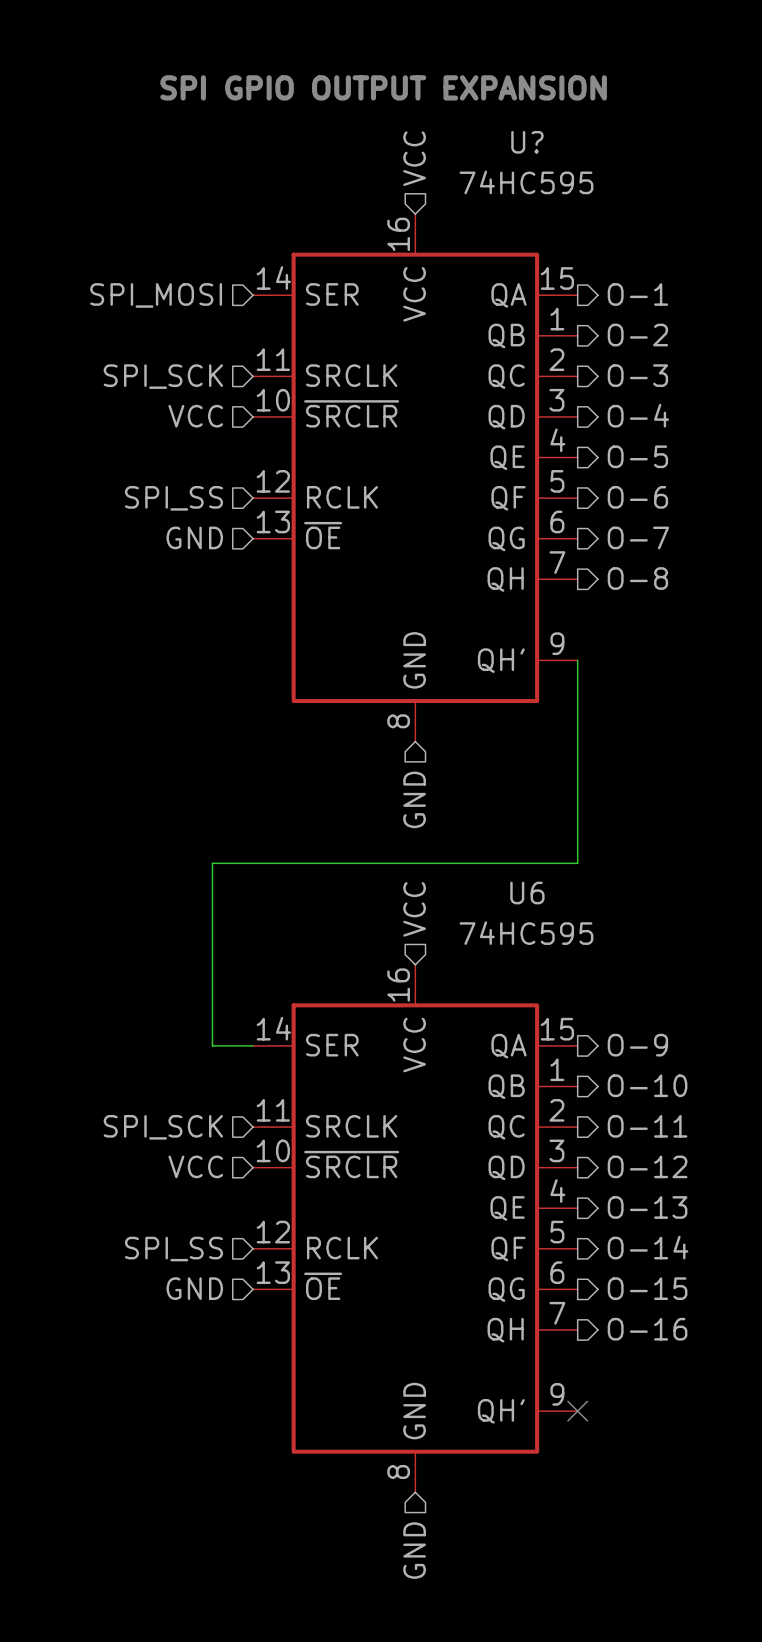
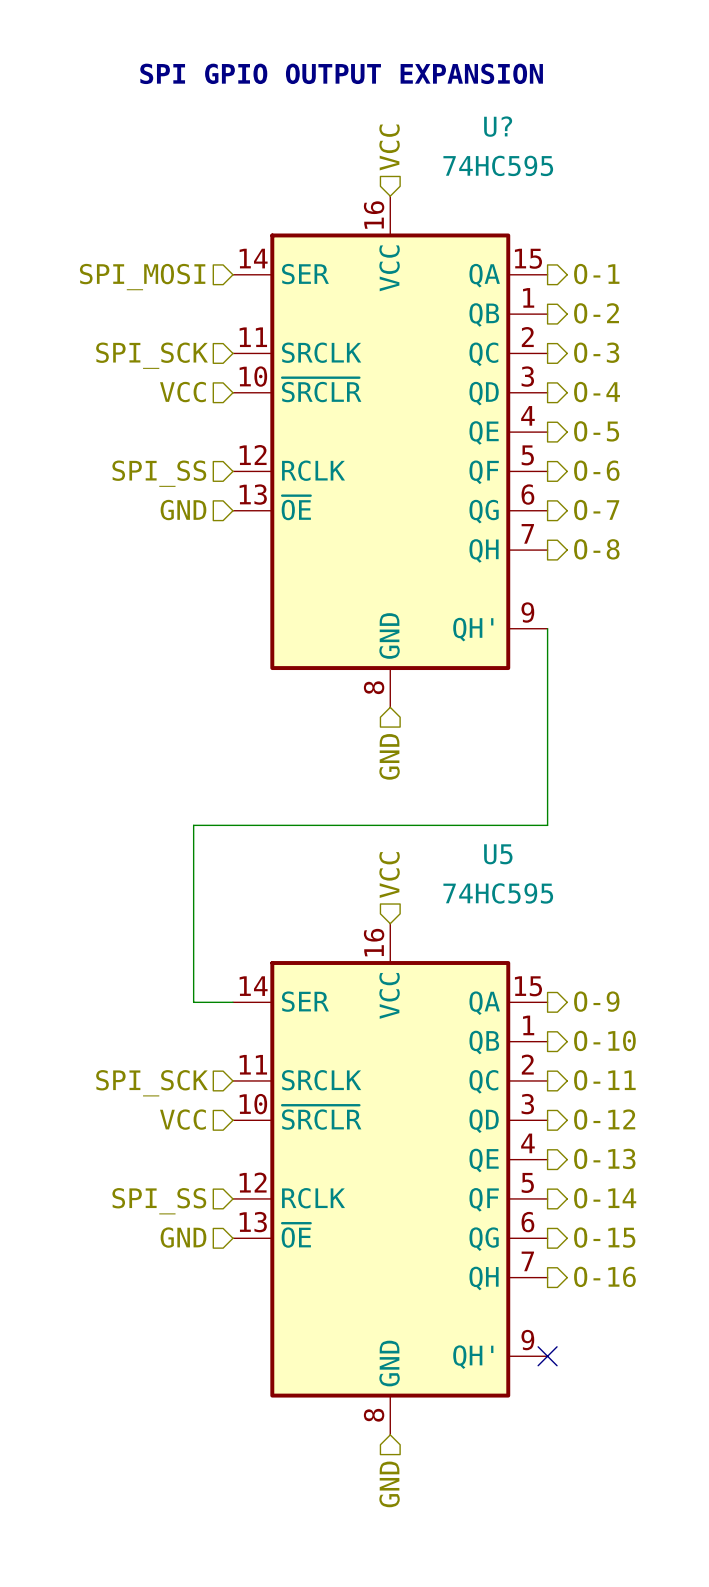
U6 name: U6 (527, 893) -> U5 (498, 854)

